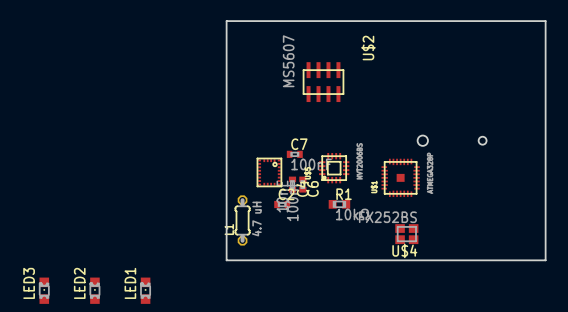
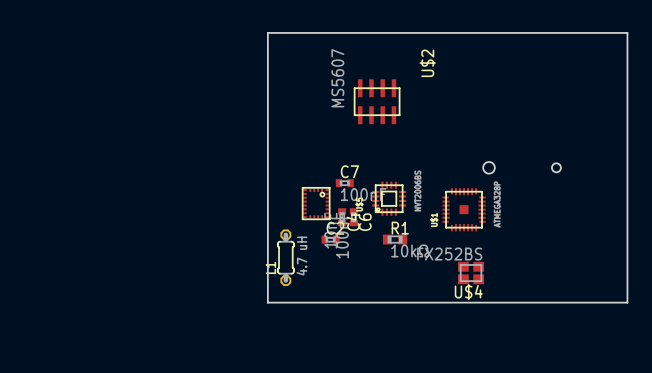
LED3: (44, 290) -> none
LED2: (94, 290) -> none
LED1: (145, 290) -> none

